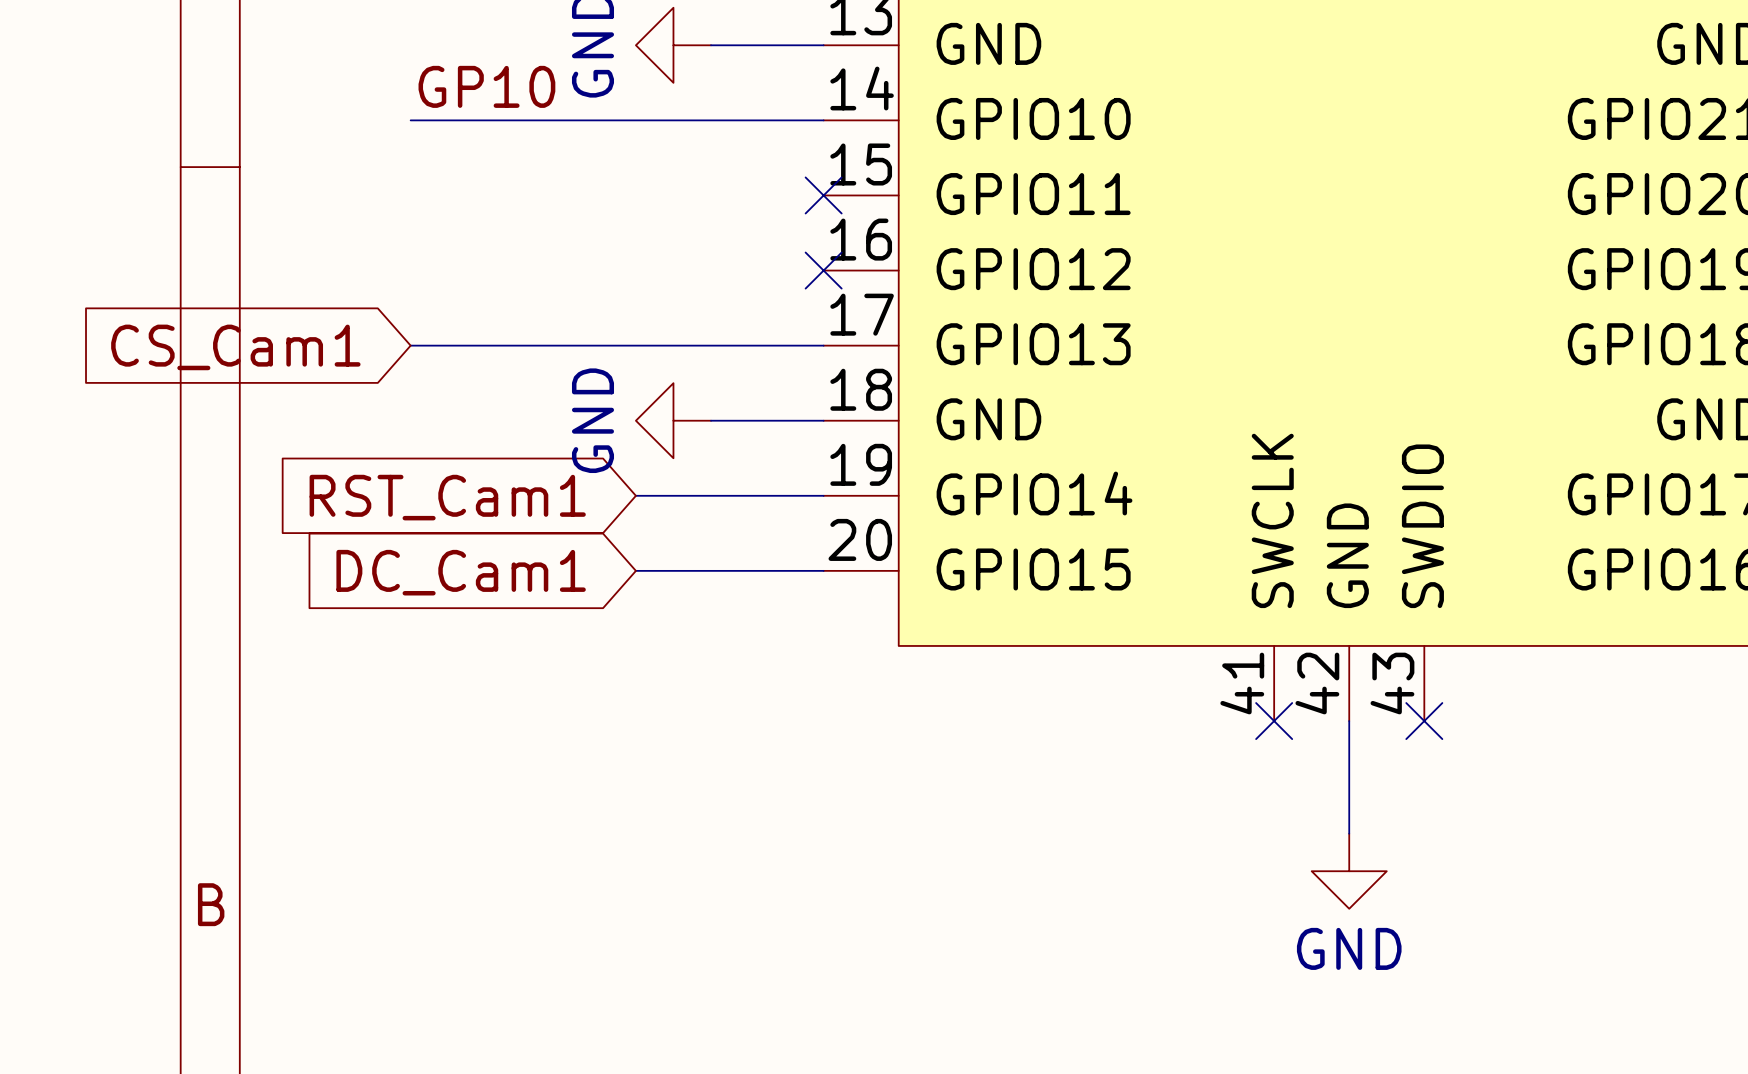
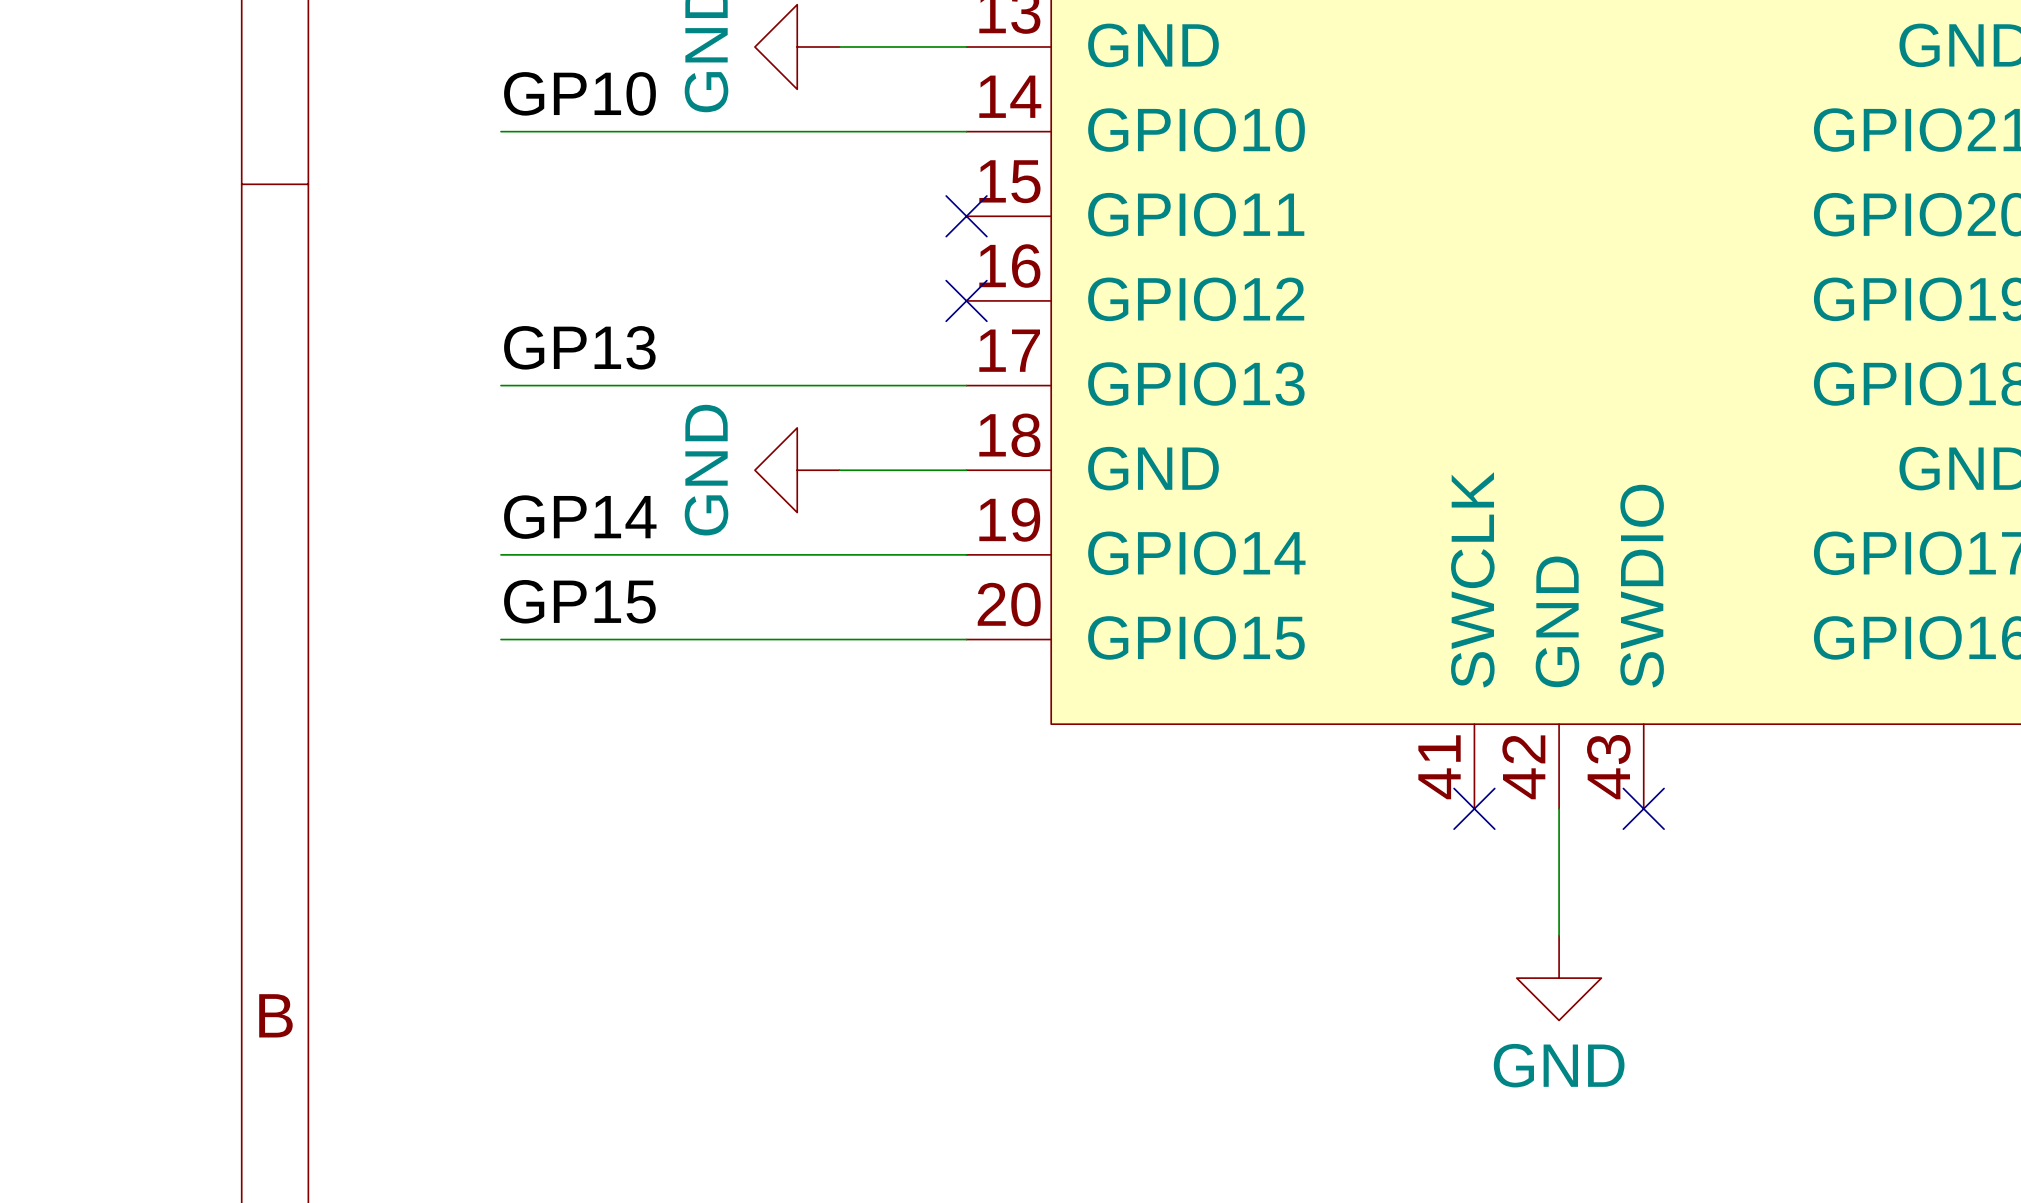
label: none -> GP13 (579, 347)
global label: CS_Cam1 (235, 347) -> none
label: none -> GP14 (580, 517)
wire: none -> (500, 554) (754, 554)
global label: RST_Cam1 (447, 497) -> none
label: none -> GP15 (579, 601)
wire: none -> (500, 639) (754, 639)
global label: DC_Cam1 (461, 572) -> none

